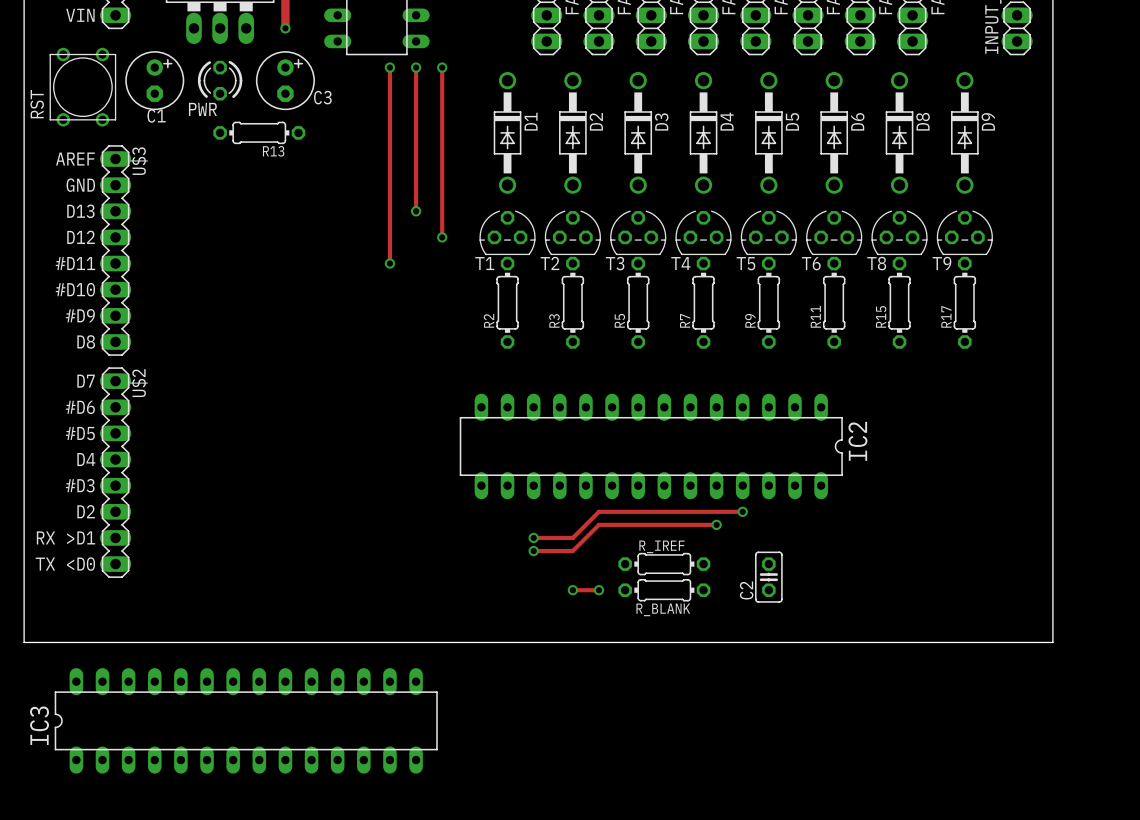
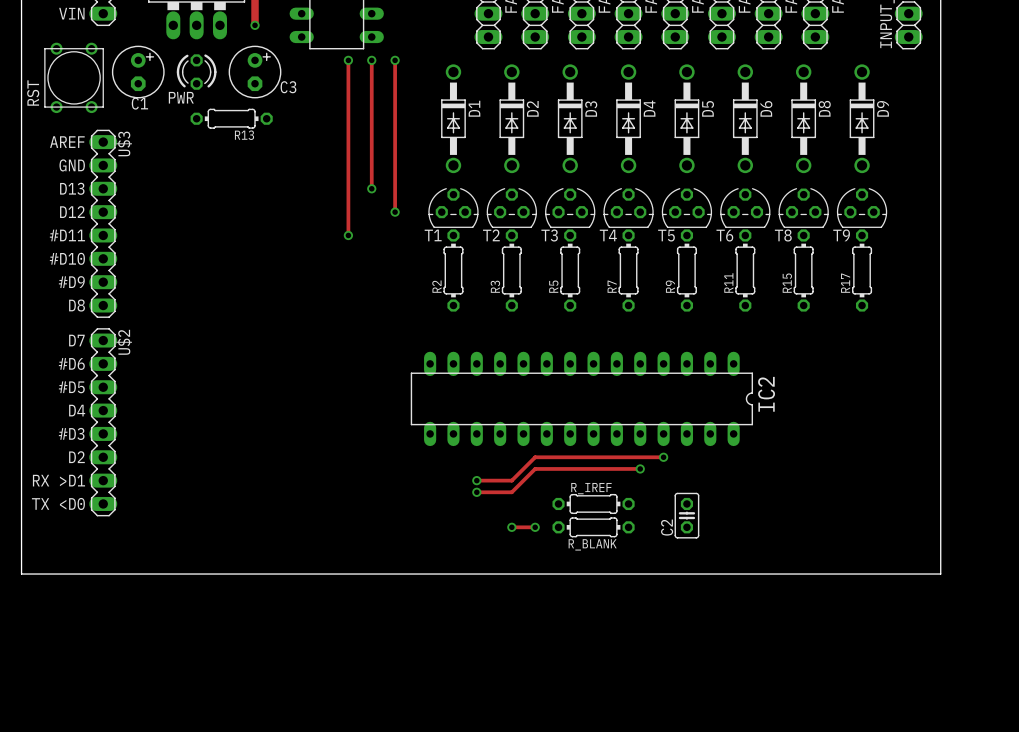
IC3: (246, 720) -> none

